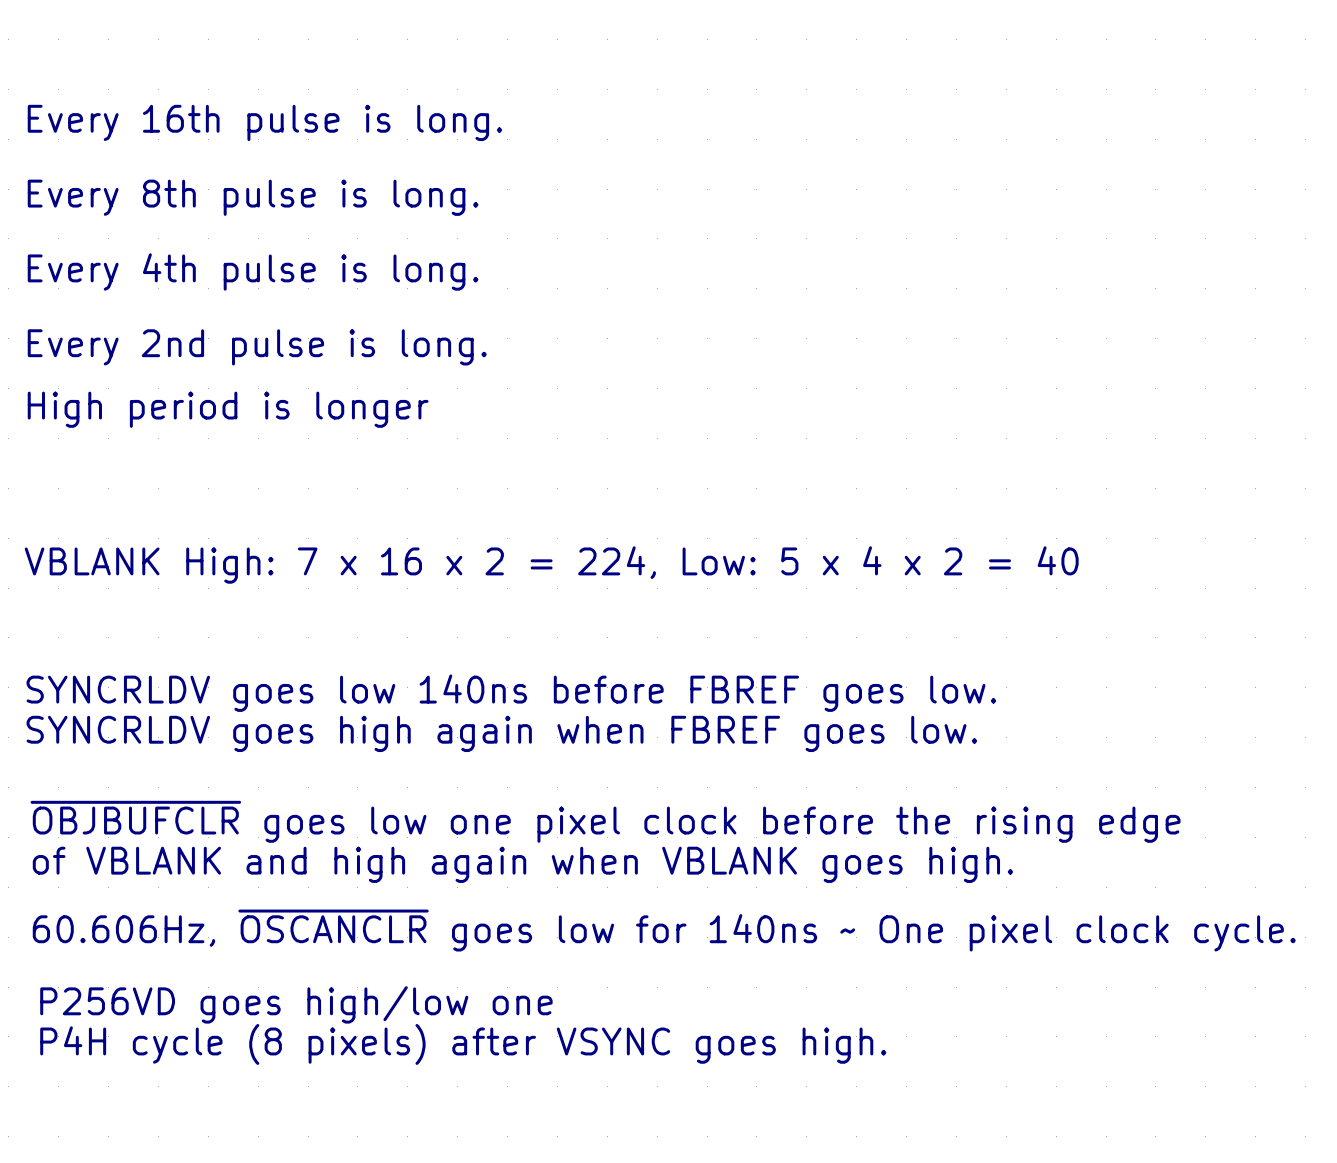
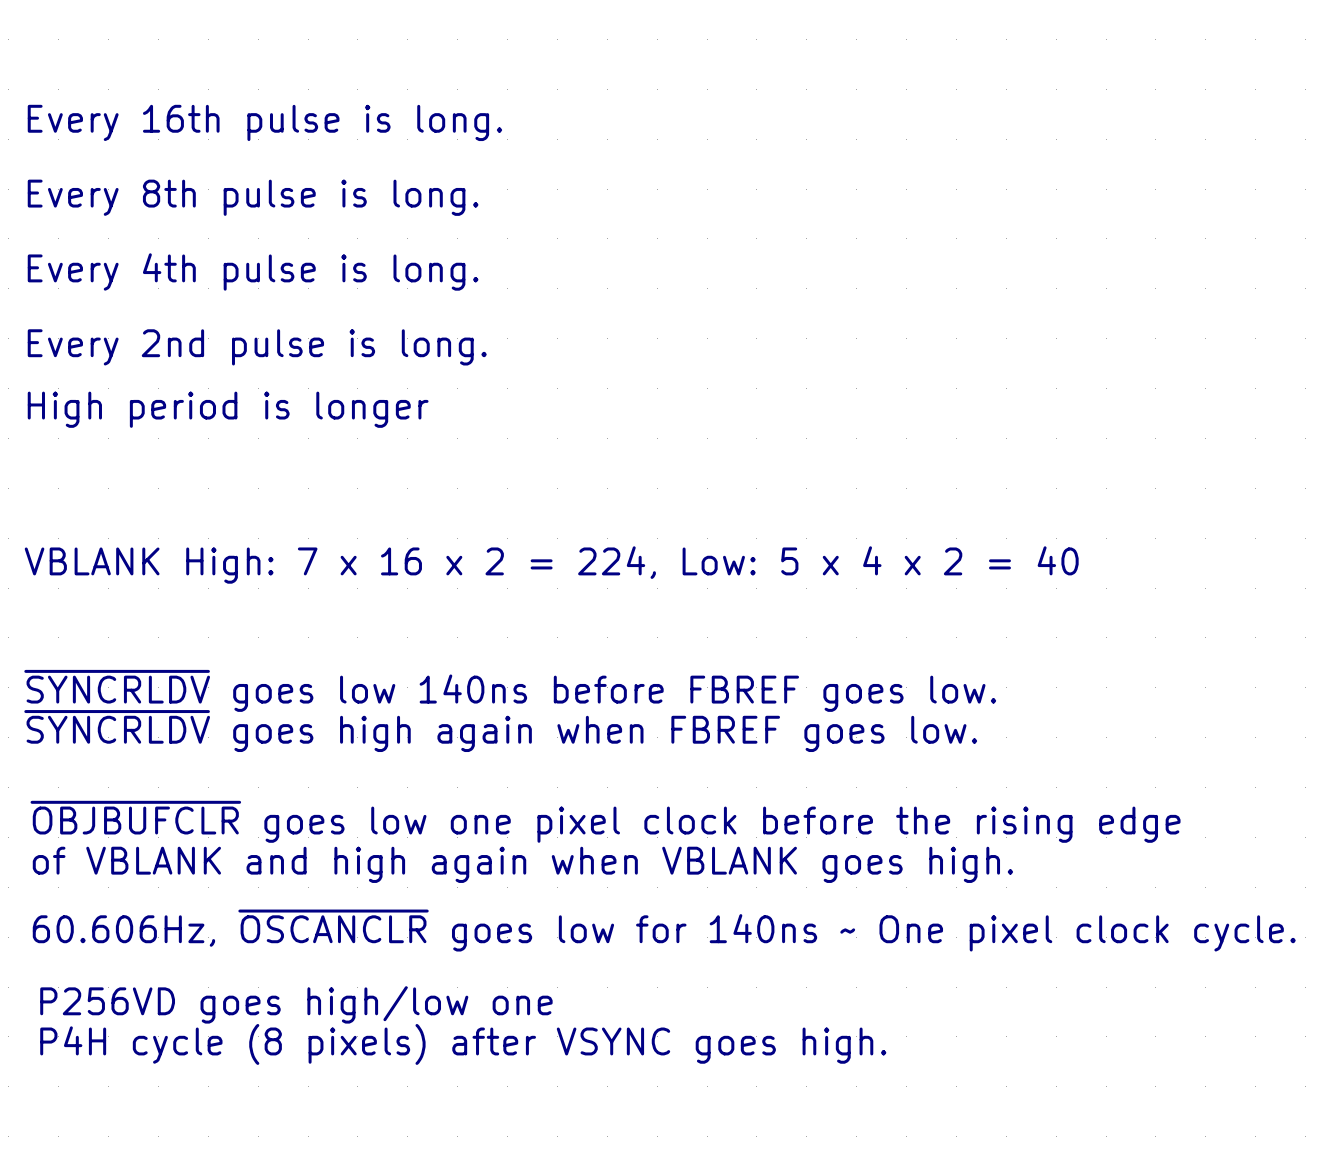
text: SYNCRLDV goes low 140ns before FBREF goes low. (511, 693) -> ~{SYNCRLDV} goes low 140ns before FBREF goes low. (510, 690)
text: SYNCRLDV goes high again when FBREF goes low. (501, 733) -> ~{SYNCRLDV} goes high again when FBREF goes low. (500, 731)

